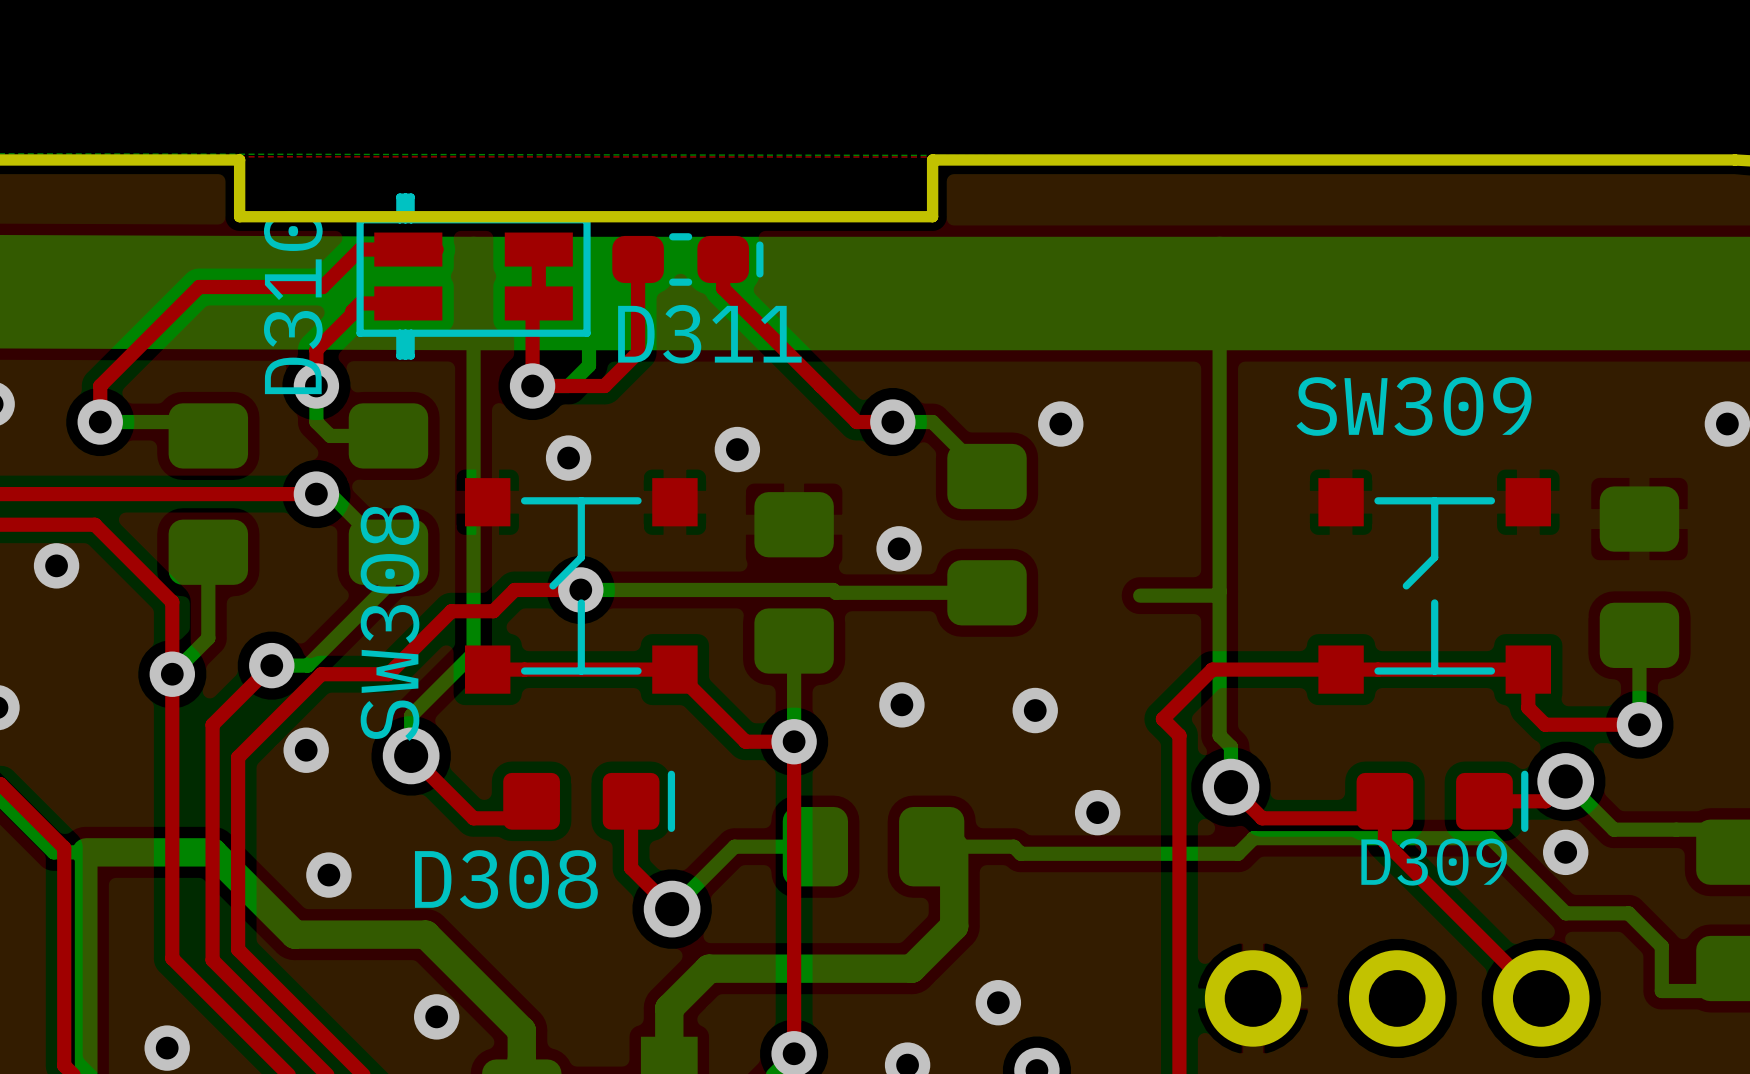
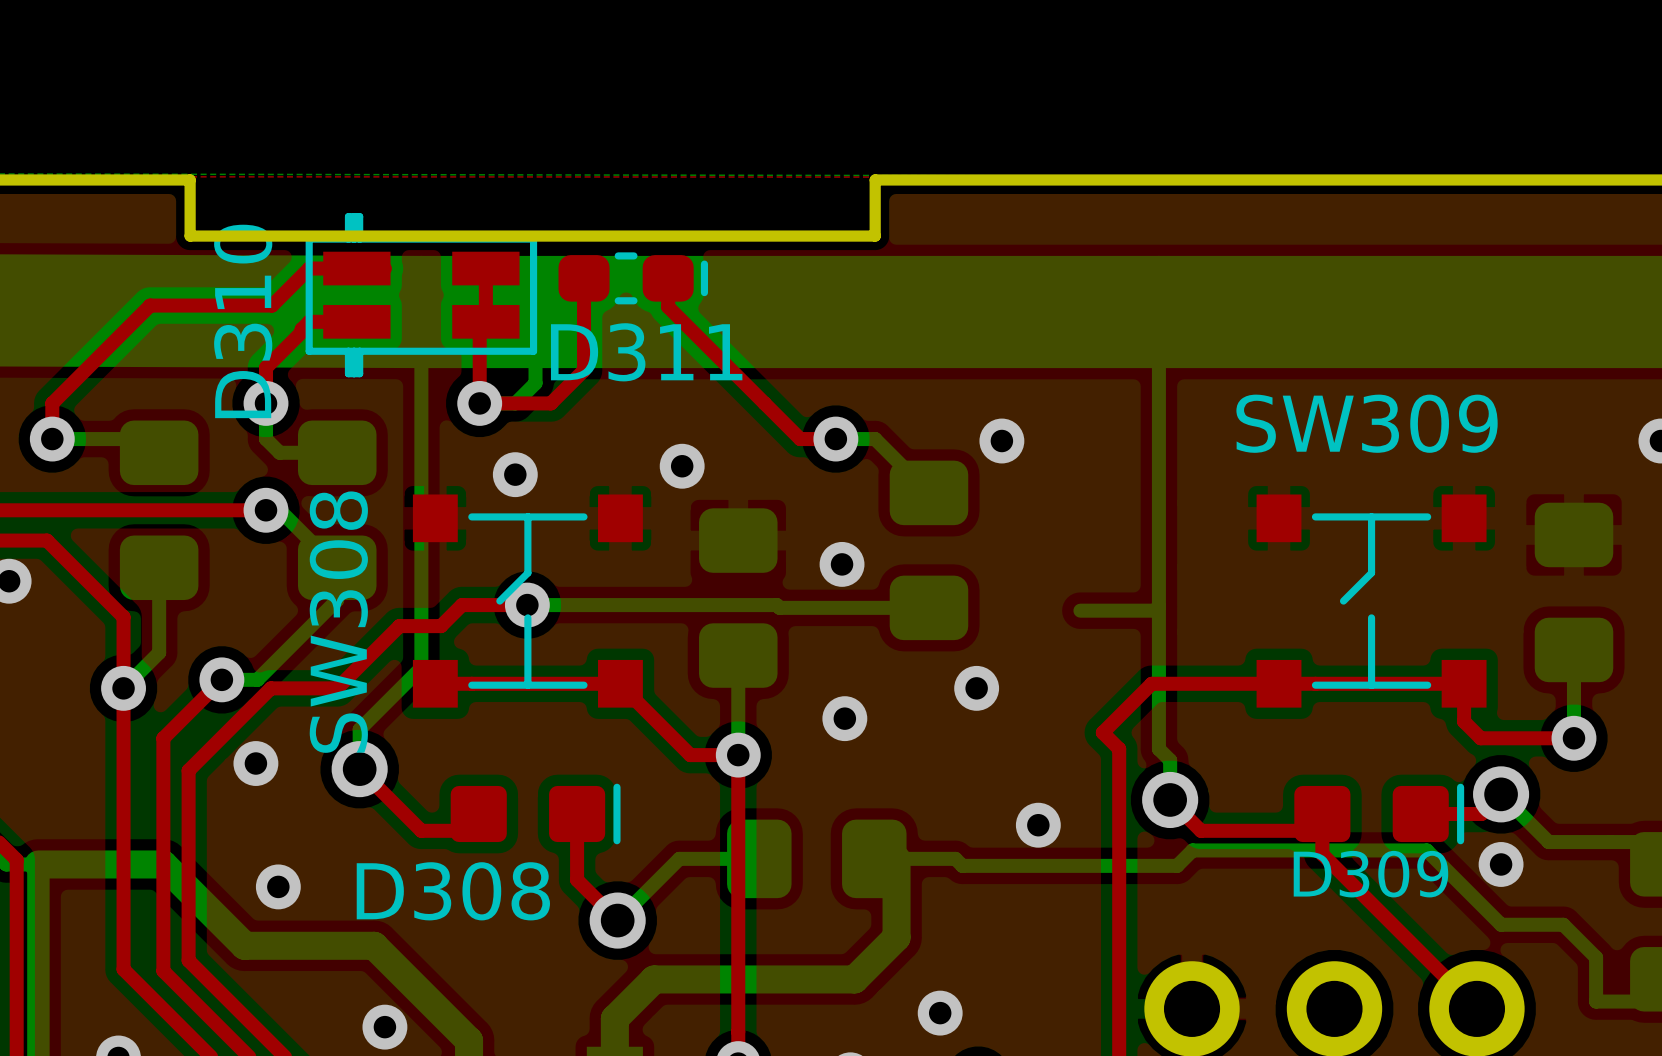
via position: (1035, 710) -> (976, 688)

